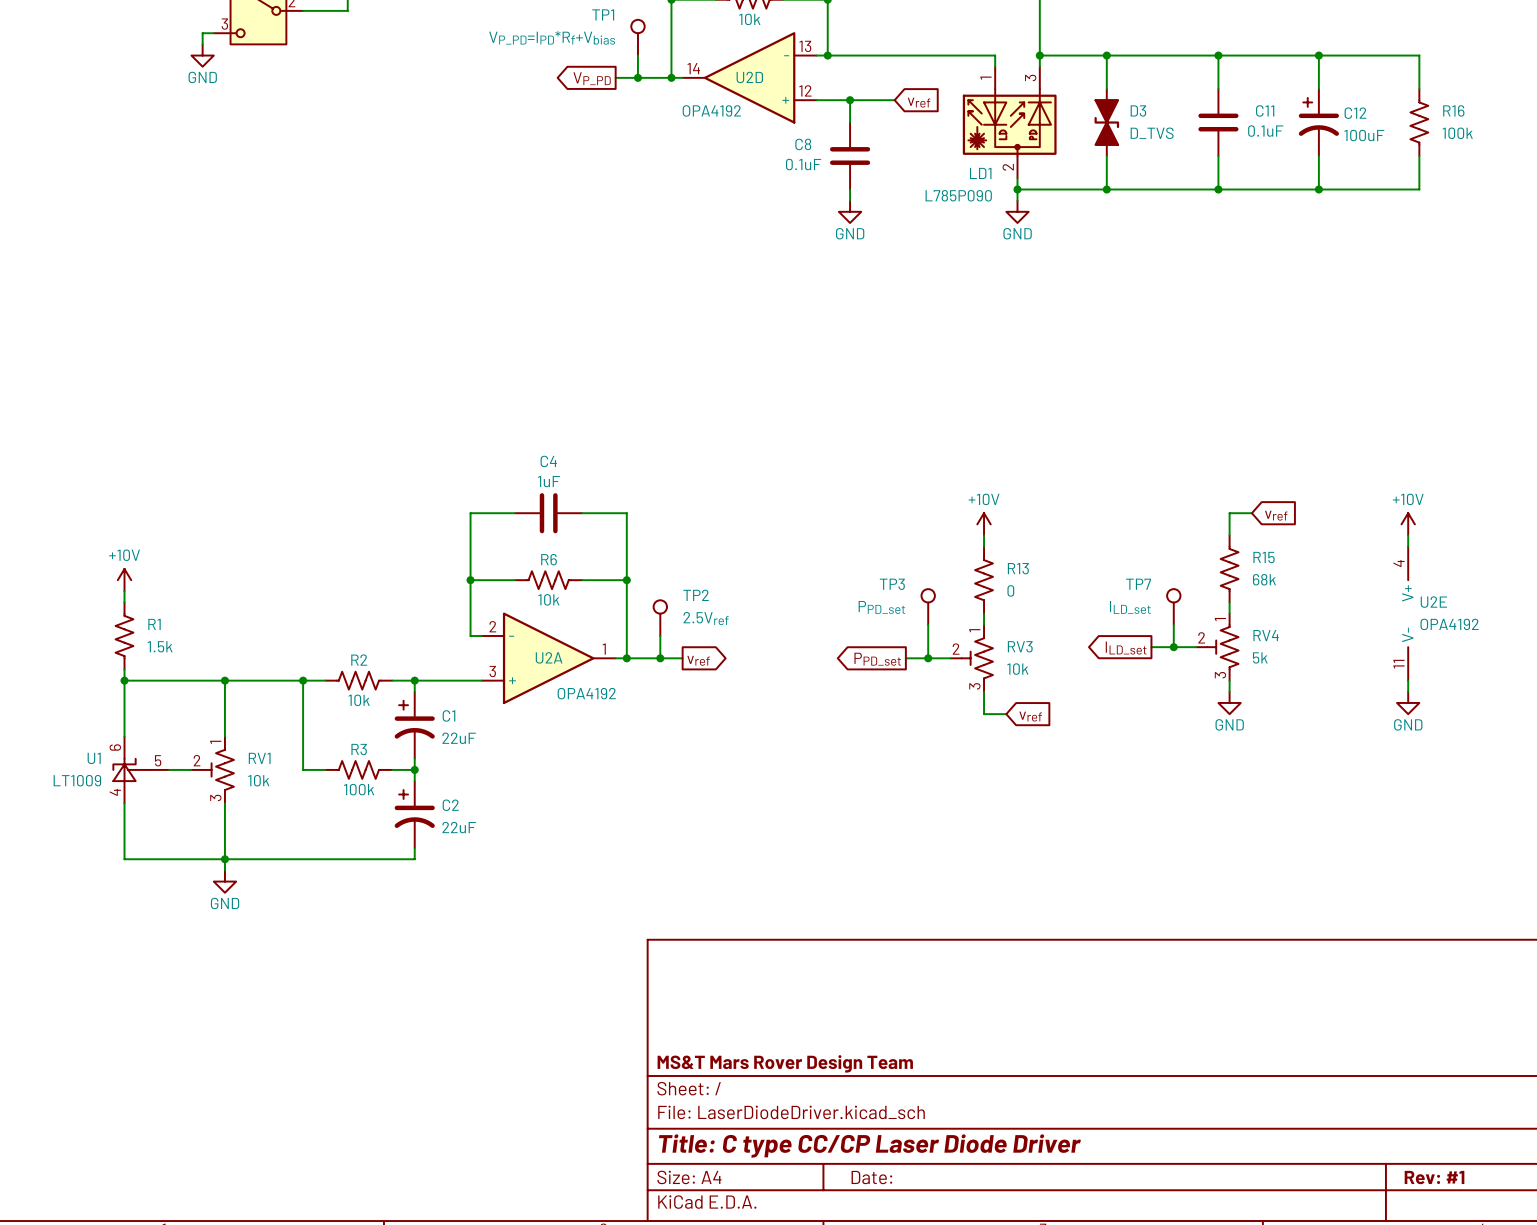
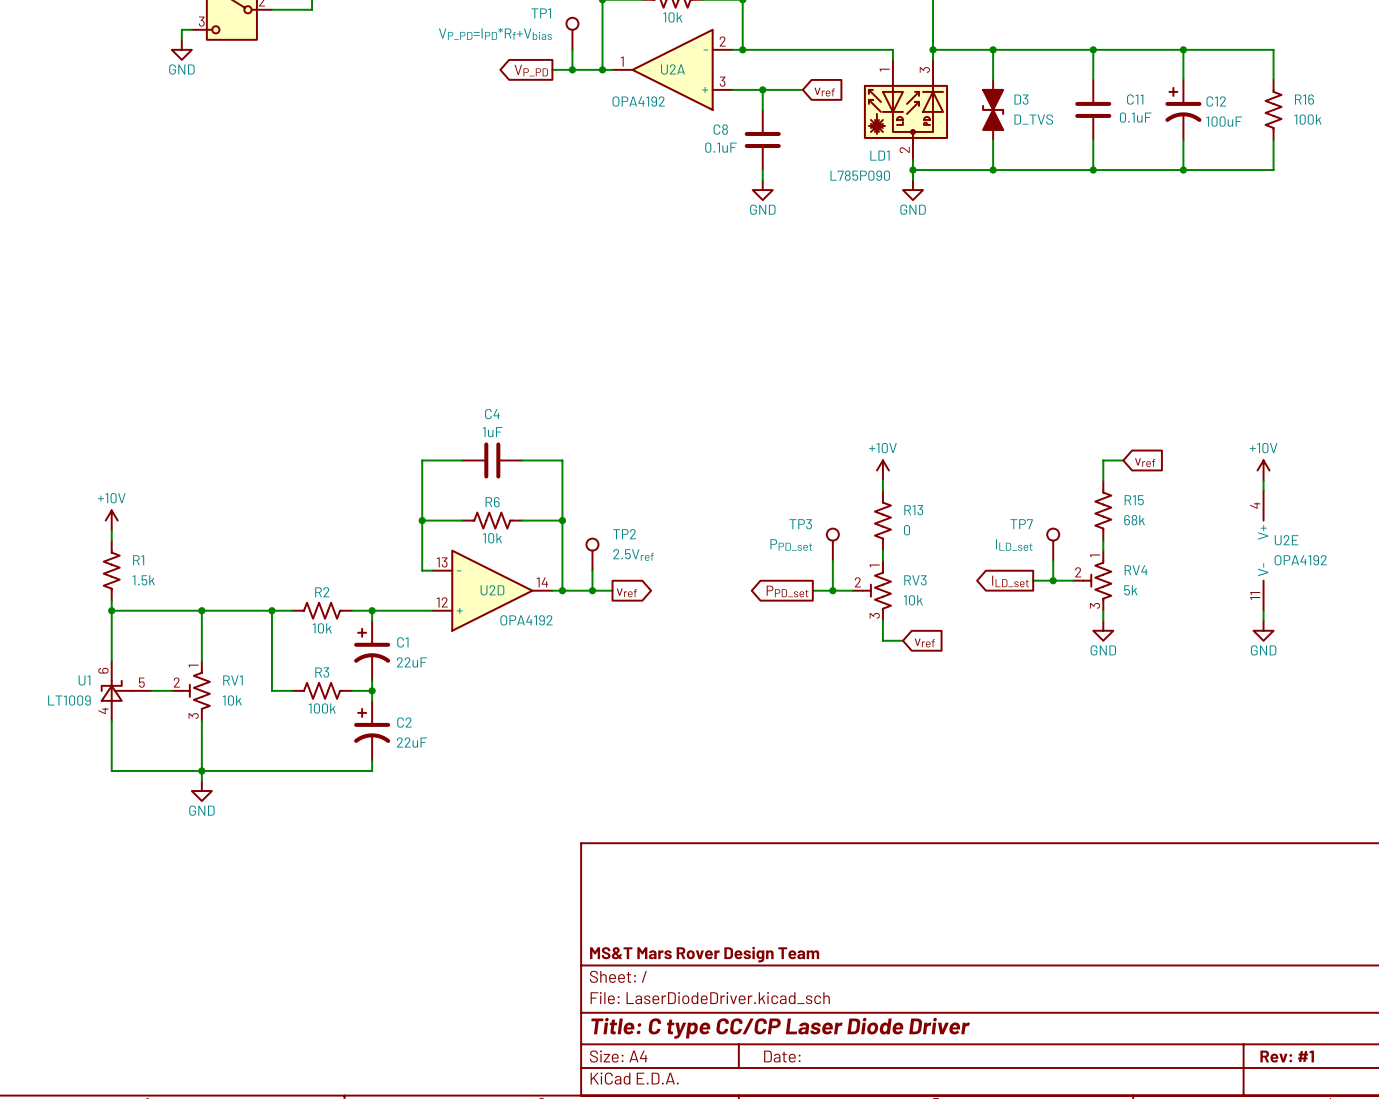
U2D flip: as is (749, 77) -> left-right (492, 590)
U2D position: (749, 77) -> (492, 590)
U2A flip: as is (548, 658) -> left-right (672, 69)
U2A position: (548, 658) -> (672, 69)

